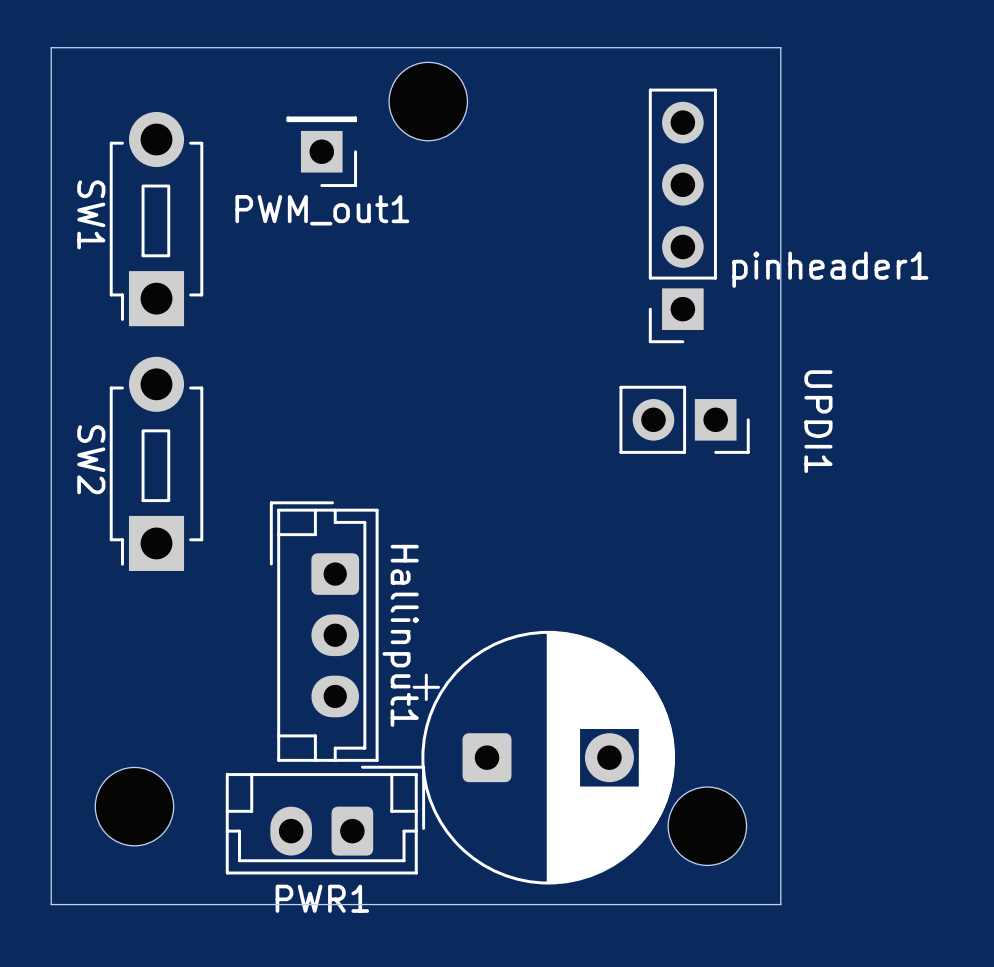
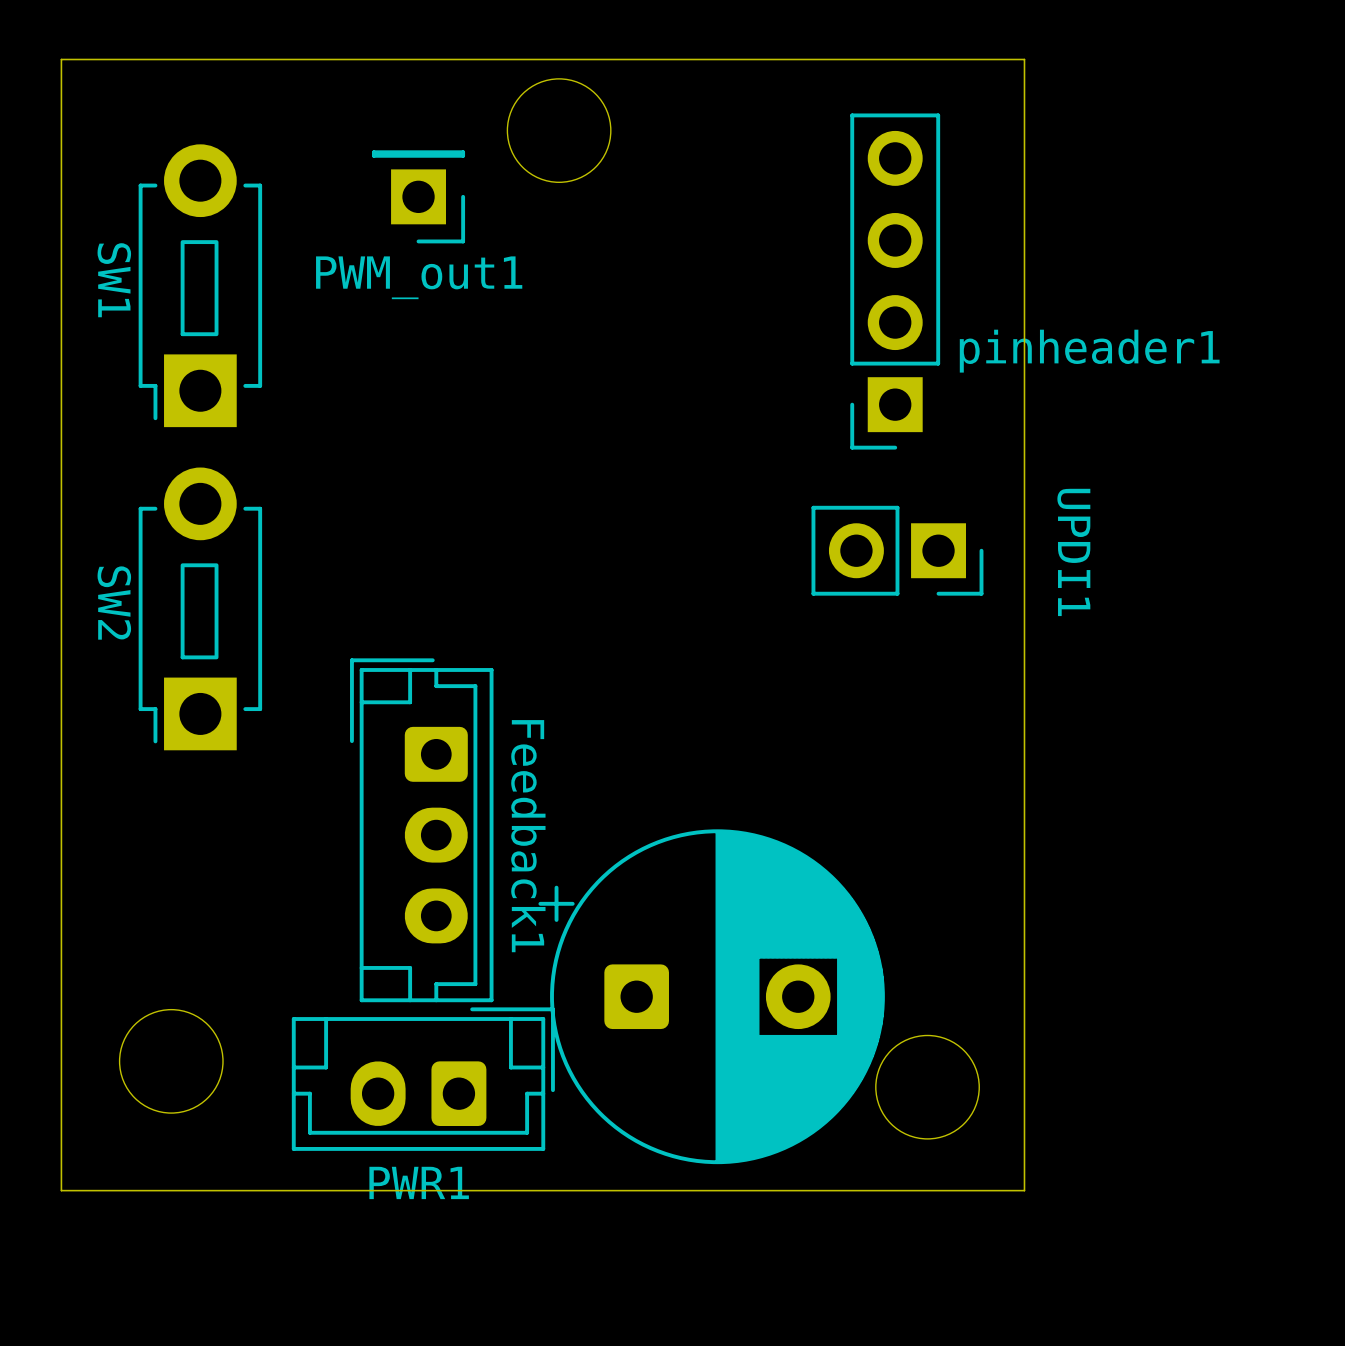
Hallinput1 name: Hallinput1 (400, 635) -> Feedback1 (528, 836)

